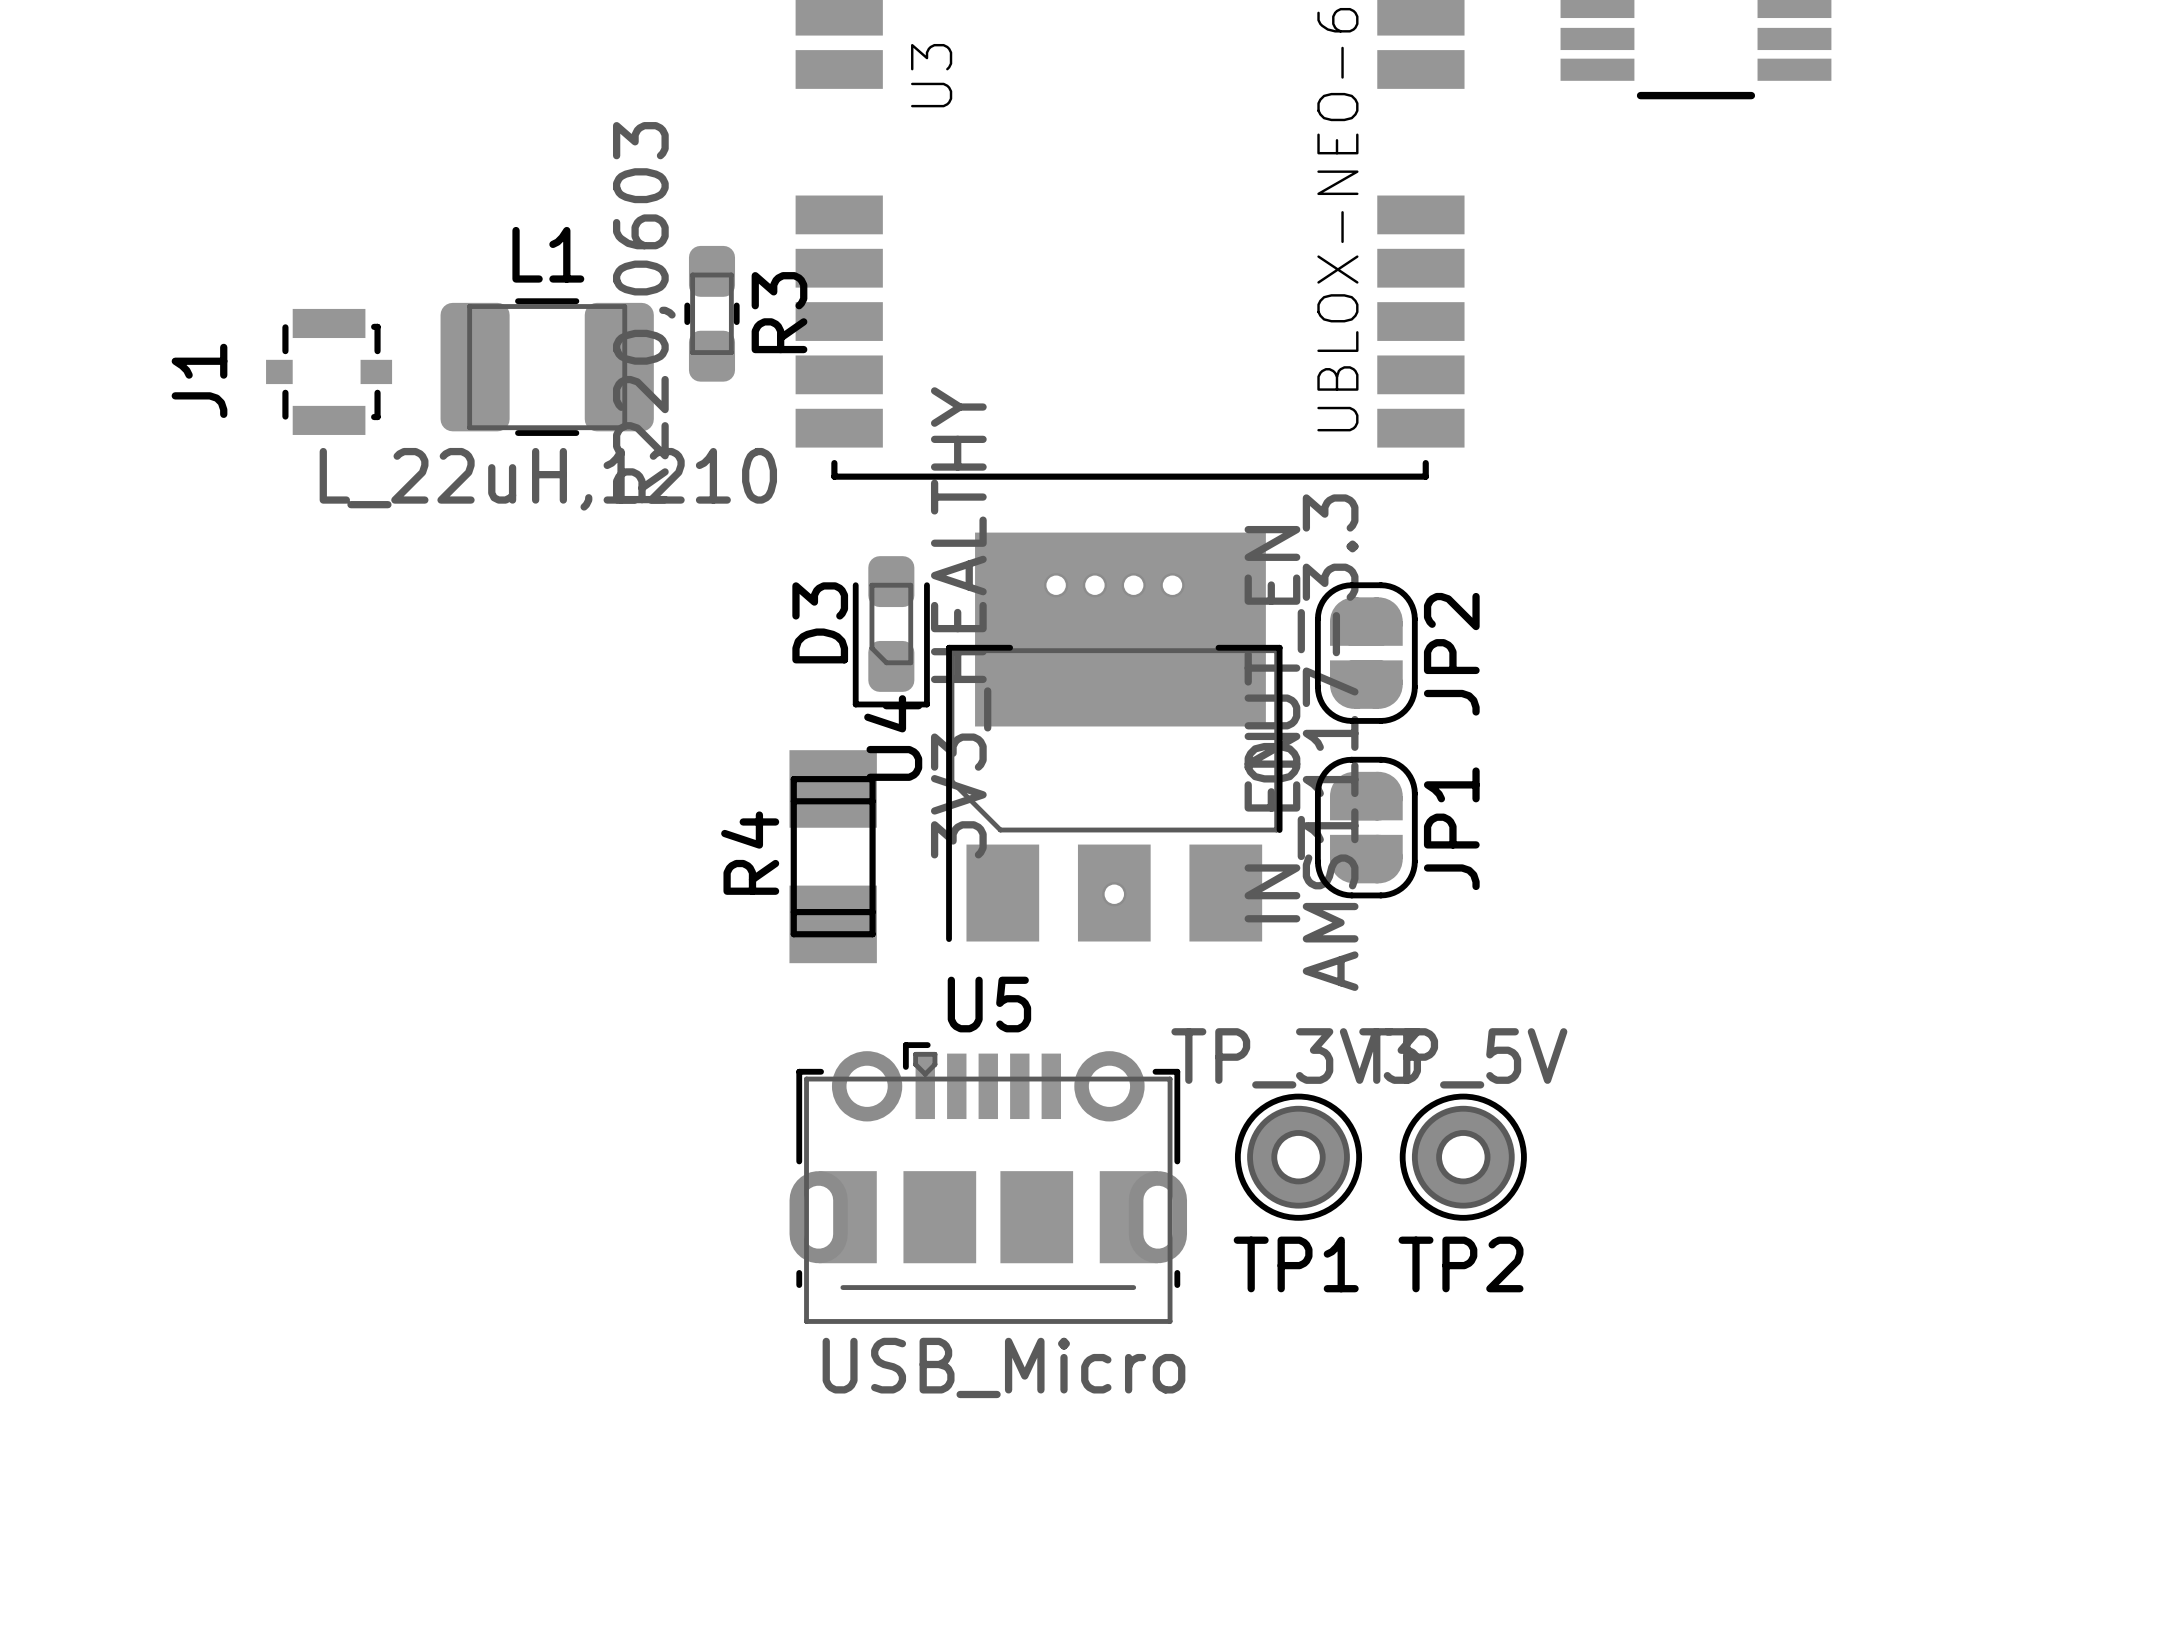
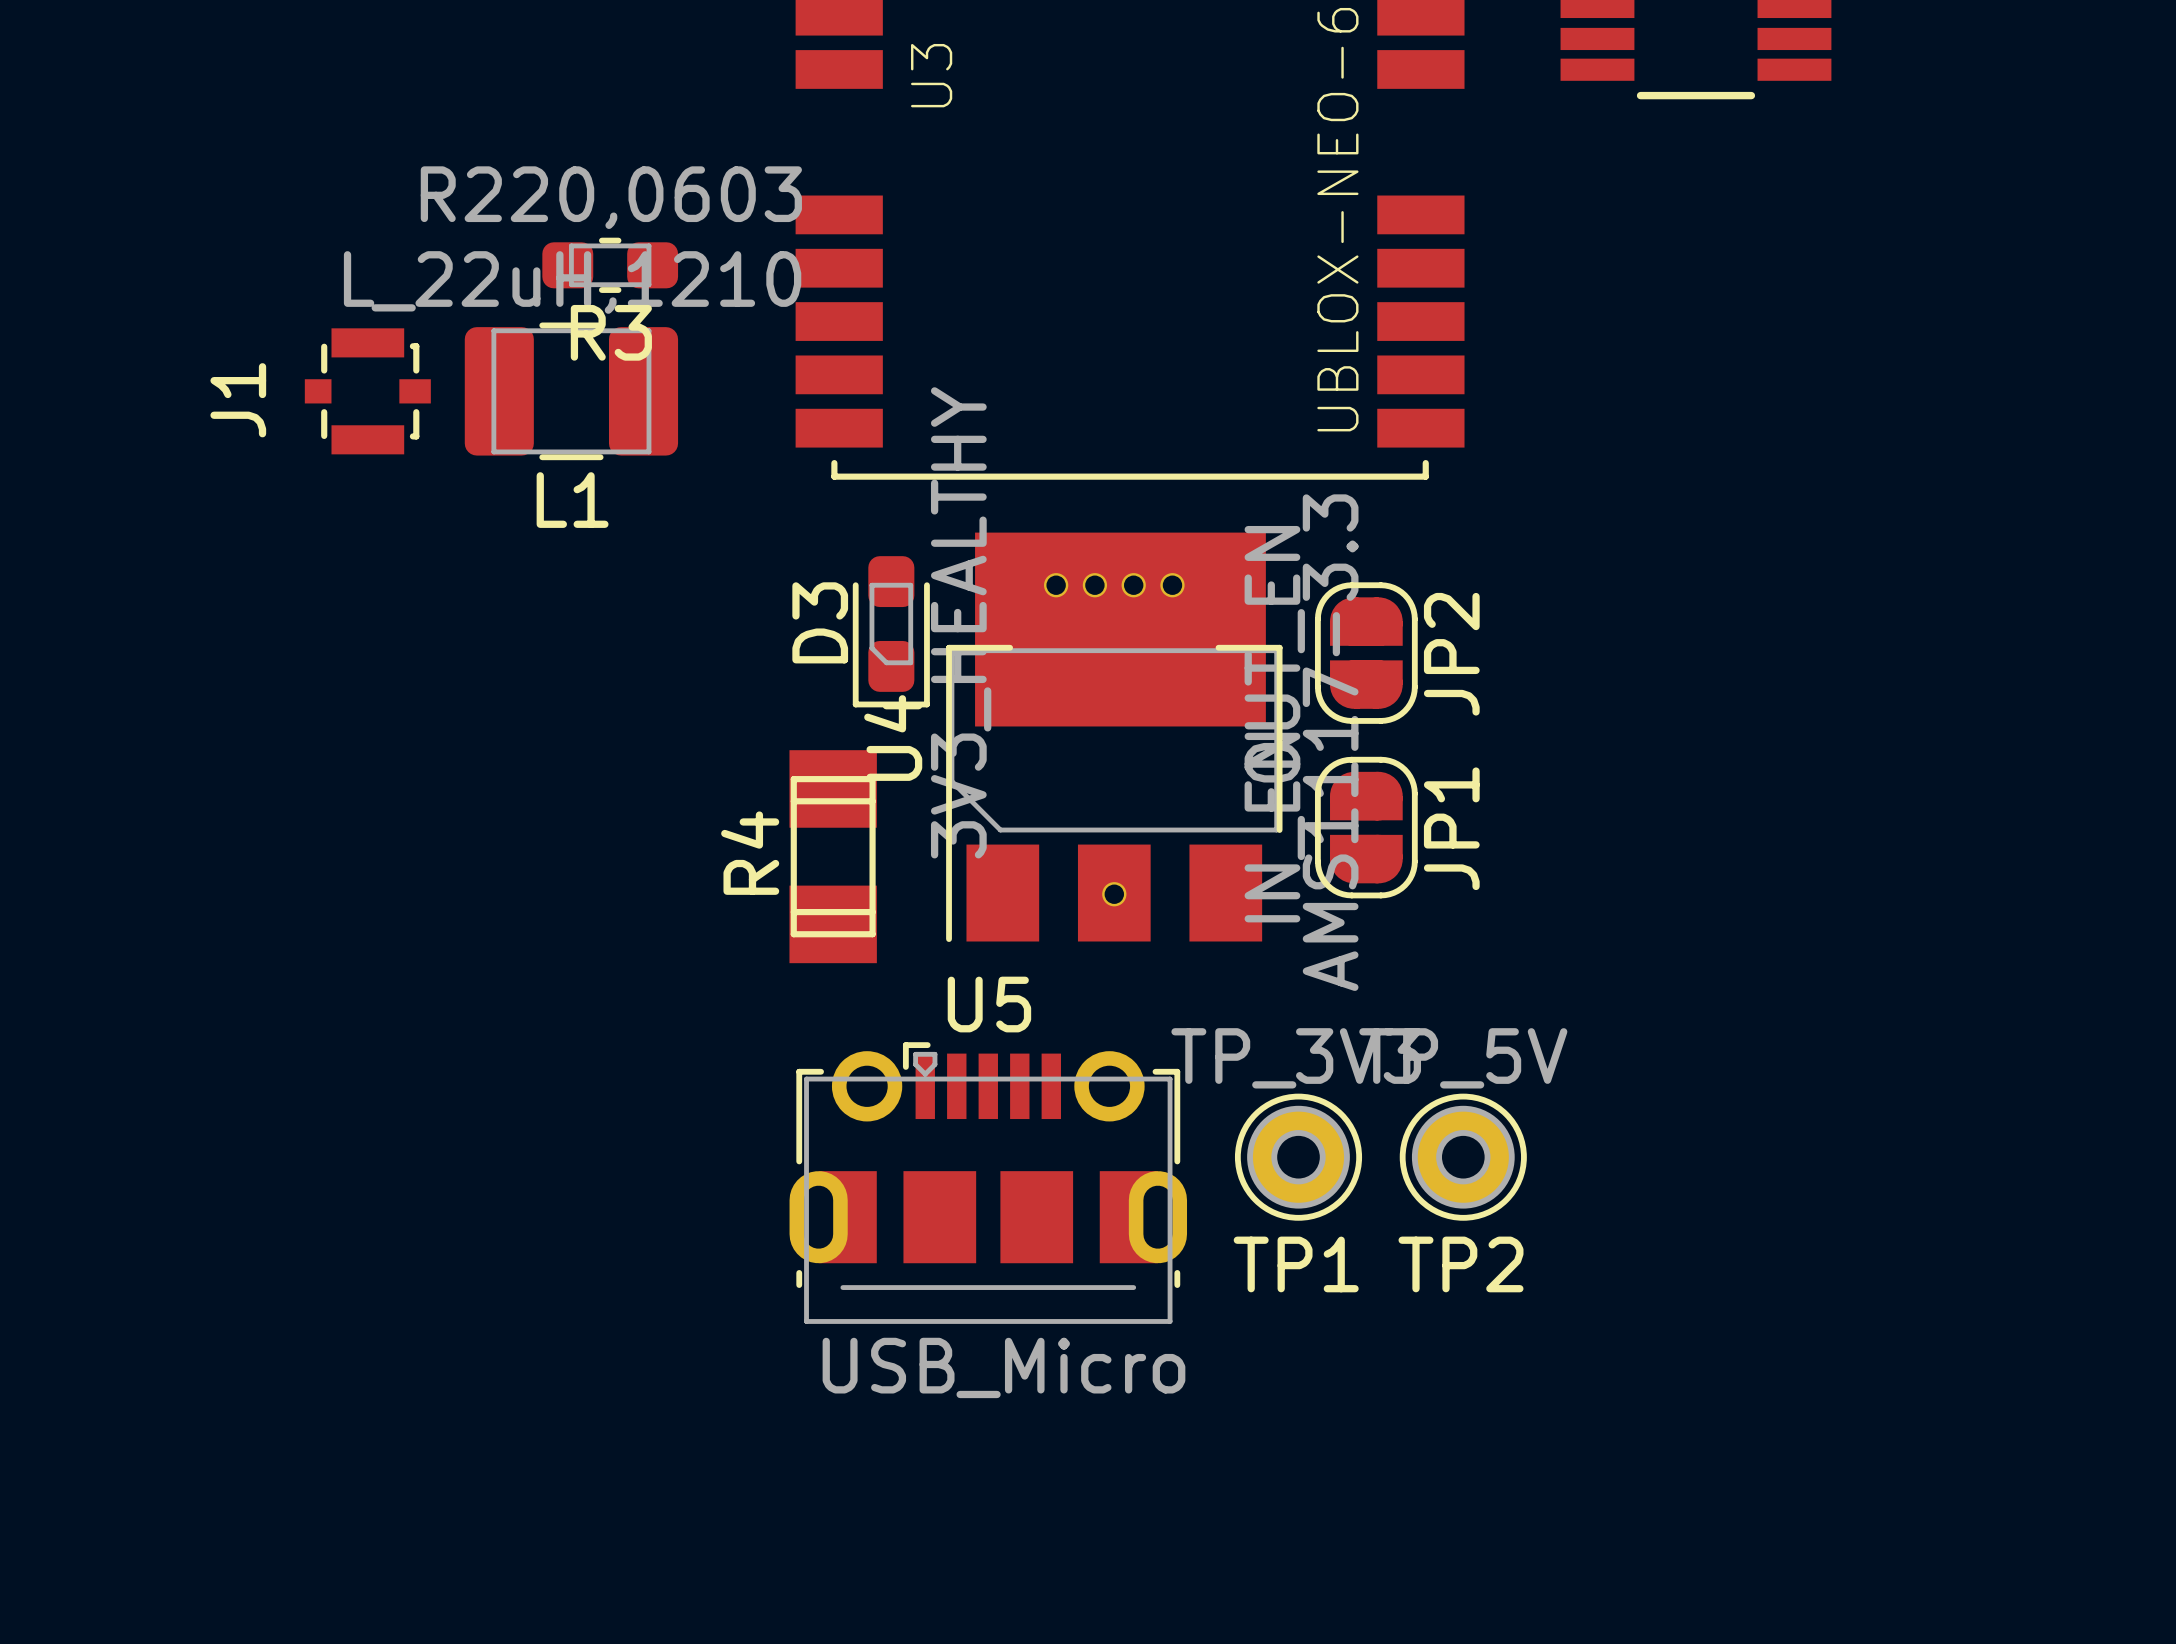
L1 name position: L1 (548, 254) -> L1 (572, 500)
R3 rotation: 0° (711, 313) -> 90° clockwise (610, 265)
R3 position: (711, 313) -> (610, 265)
L1 position: (547, 367) -> (571, 391)
J1 position: (329, 371) -> (367, 391)
L1 value position: L_22uH,1210 (548, 479) -> L_22uH,1210 (572, 282)

